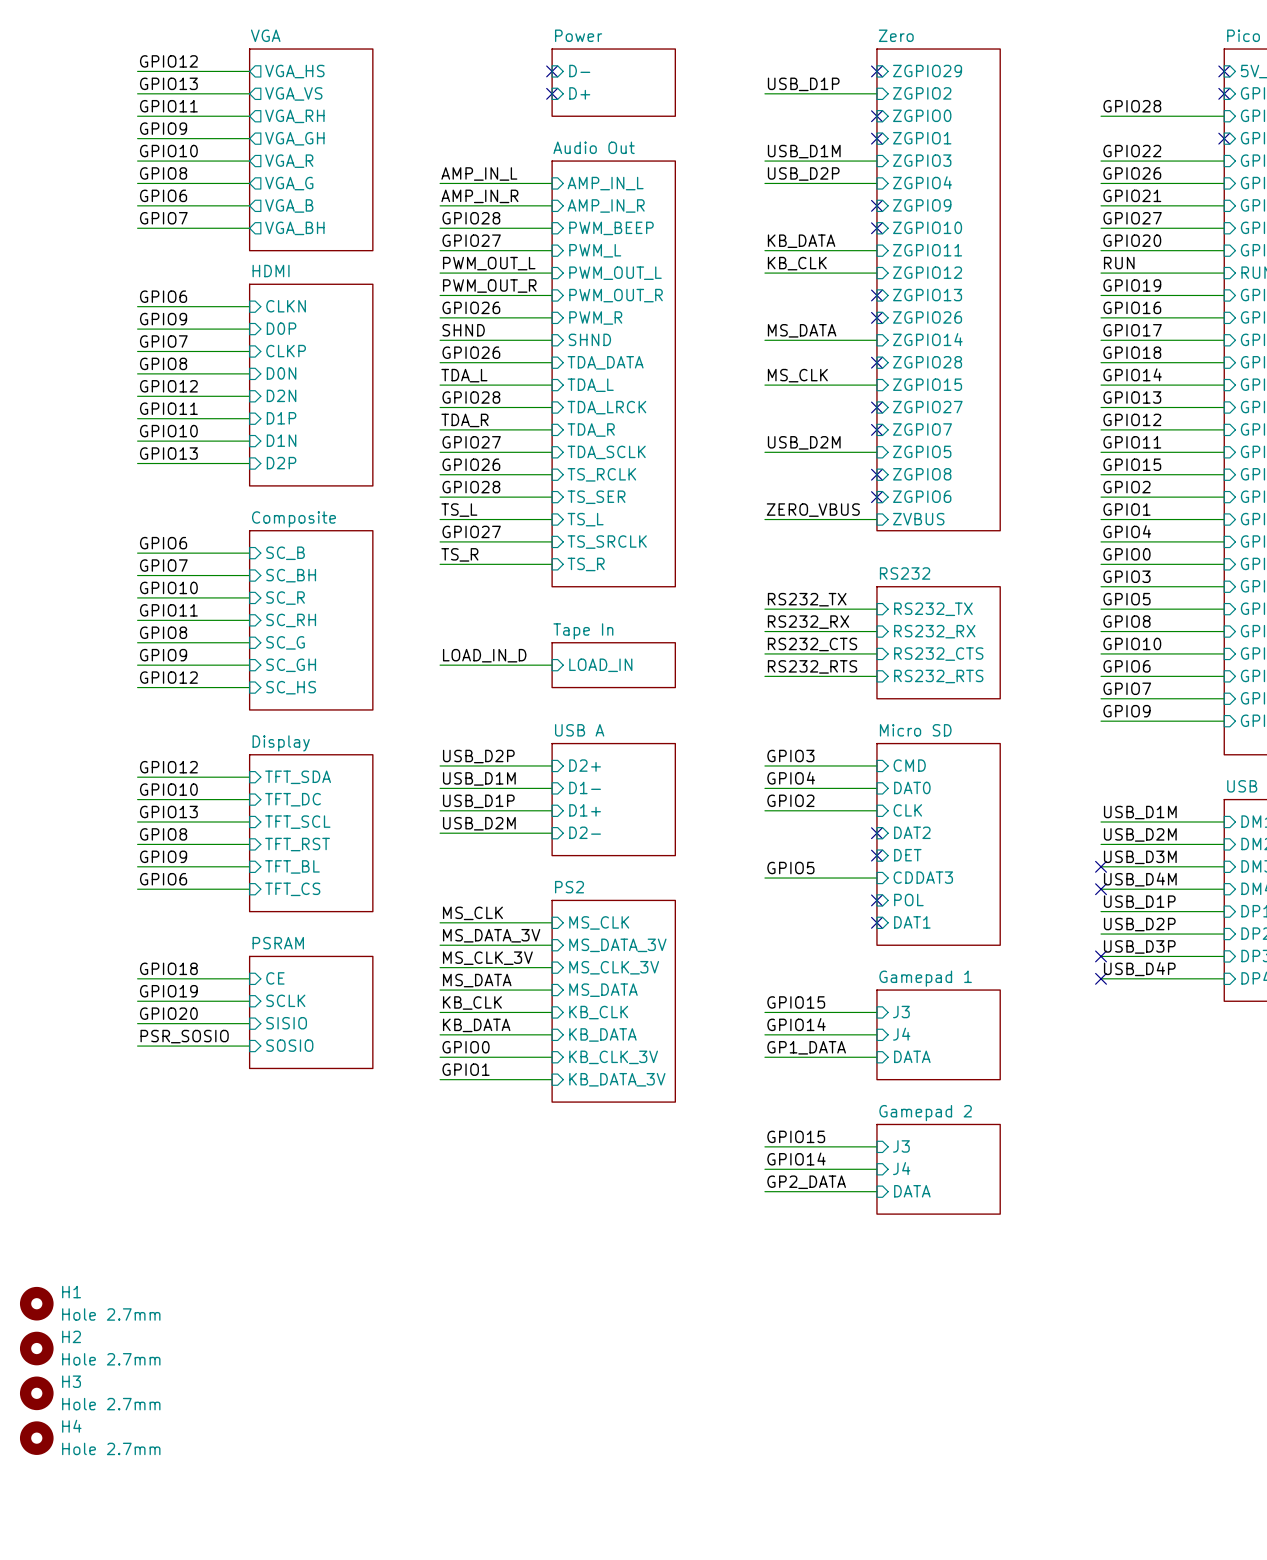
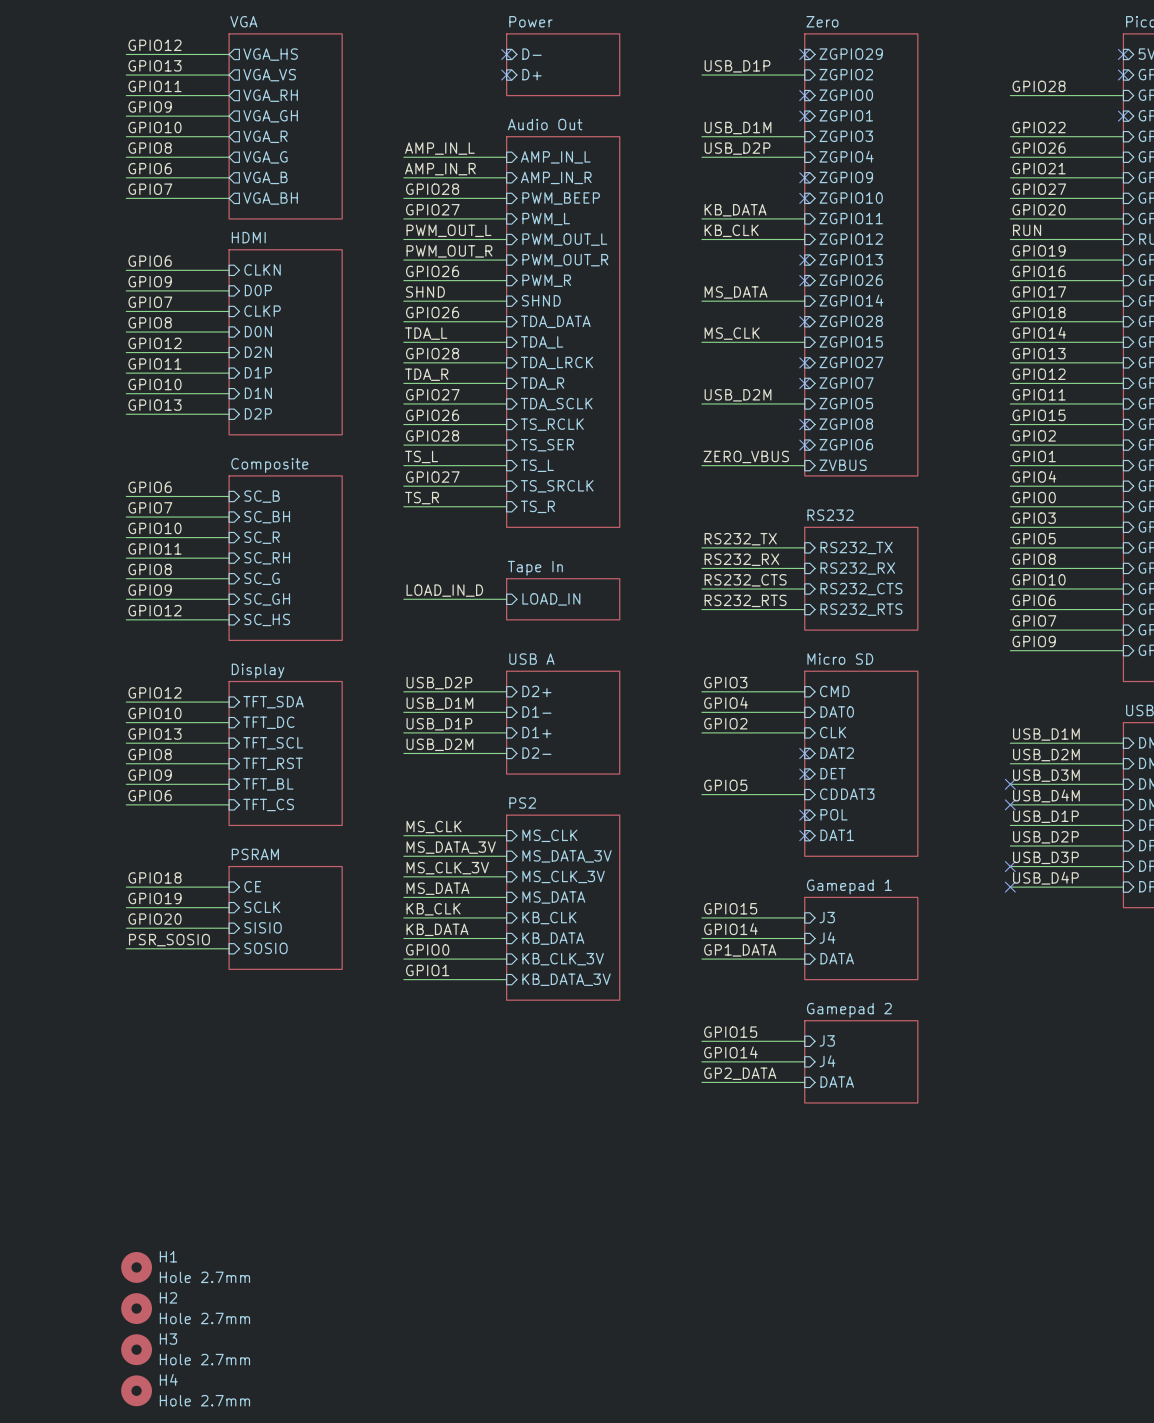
H1 position: (36, 1303) -> (136, 1267)
H2 position: (36, 1348) -> (136, 1308)
H3 position: (36, 1393) -> (136, 1349)
H4 position: (36, 1438) -> (136, 1390)

